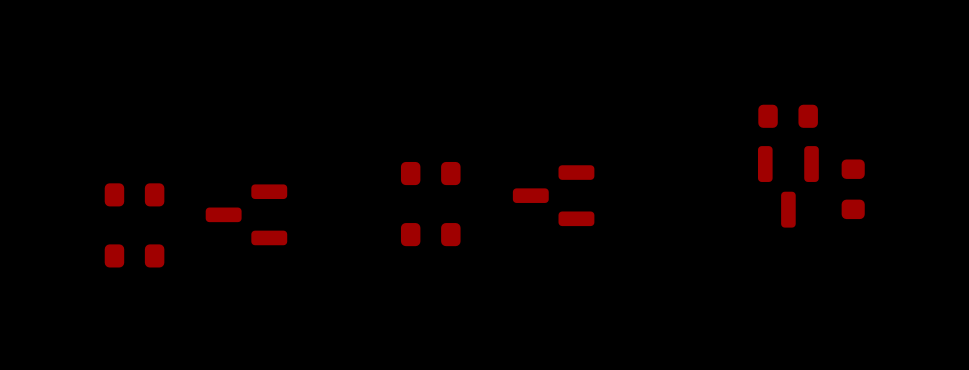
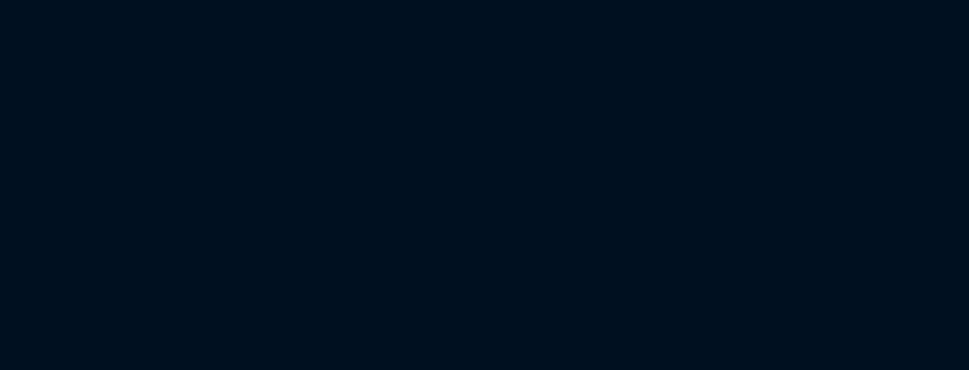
part: (788, 116) -> none
part: (430, 173) -> none
part: (788, 186) -> none
part: (853, 189) -> none
part: (134, 194) -> none
part: (553, 195) -> none
part: (246, 214) -> none
part: (430, 234) -> none
part: (134, 255) -> none

